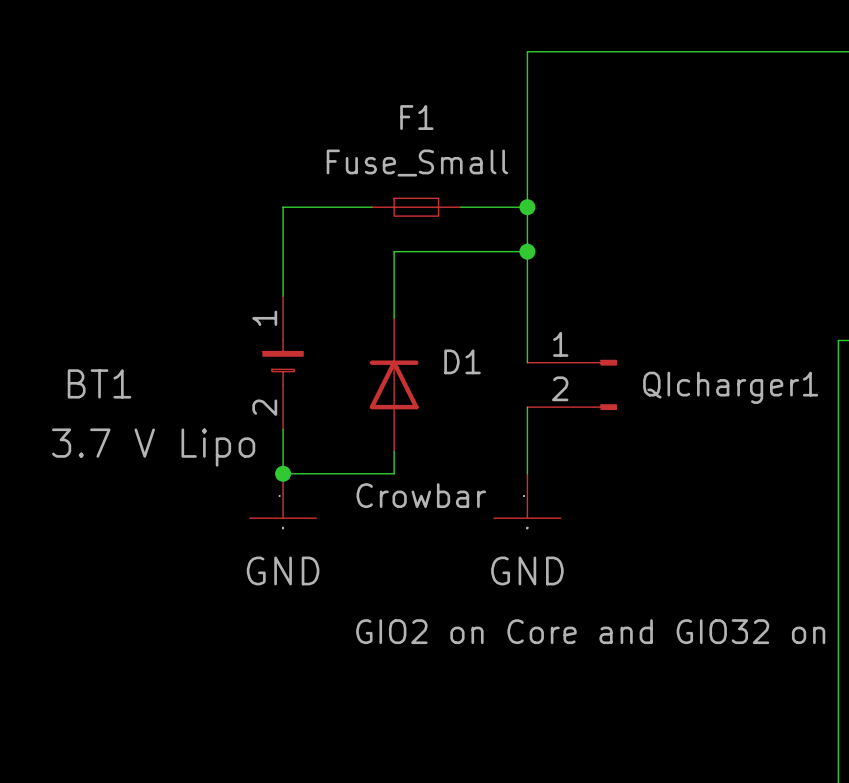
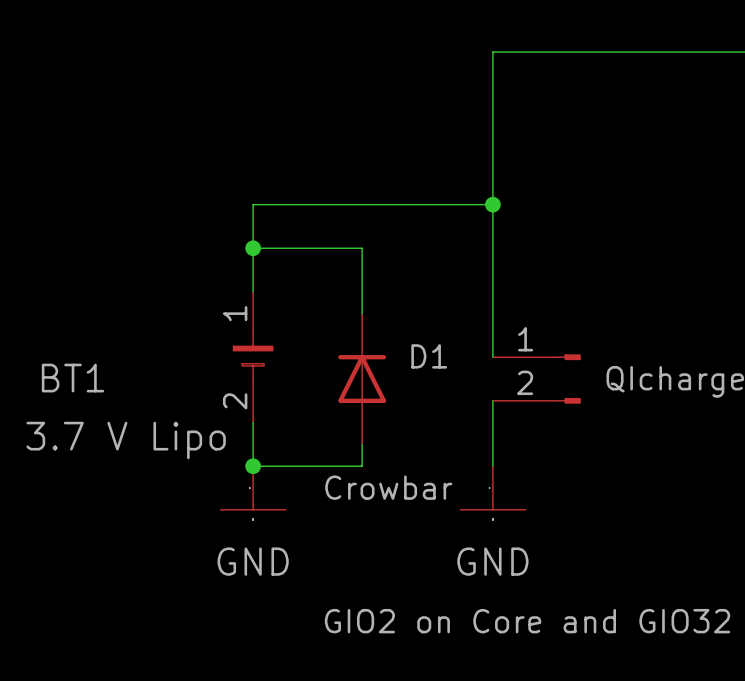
F1: Fuse_Small (416, 207) -> none
junction: none -> (253, 248)
wire: (394, 251) (527, 251) -> (362, 248) (253, 248)
junction: (527, 251) -> none

